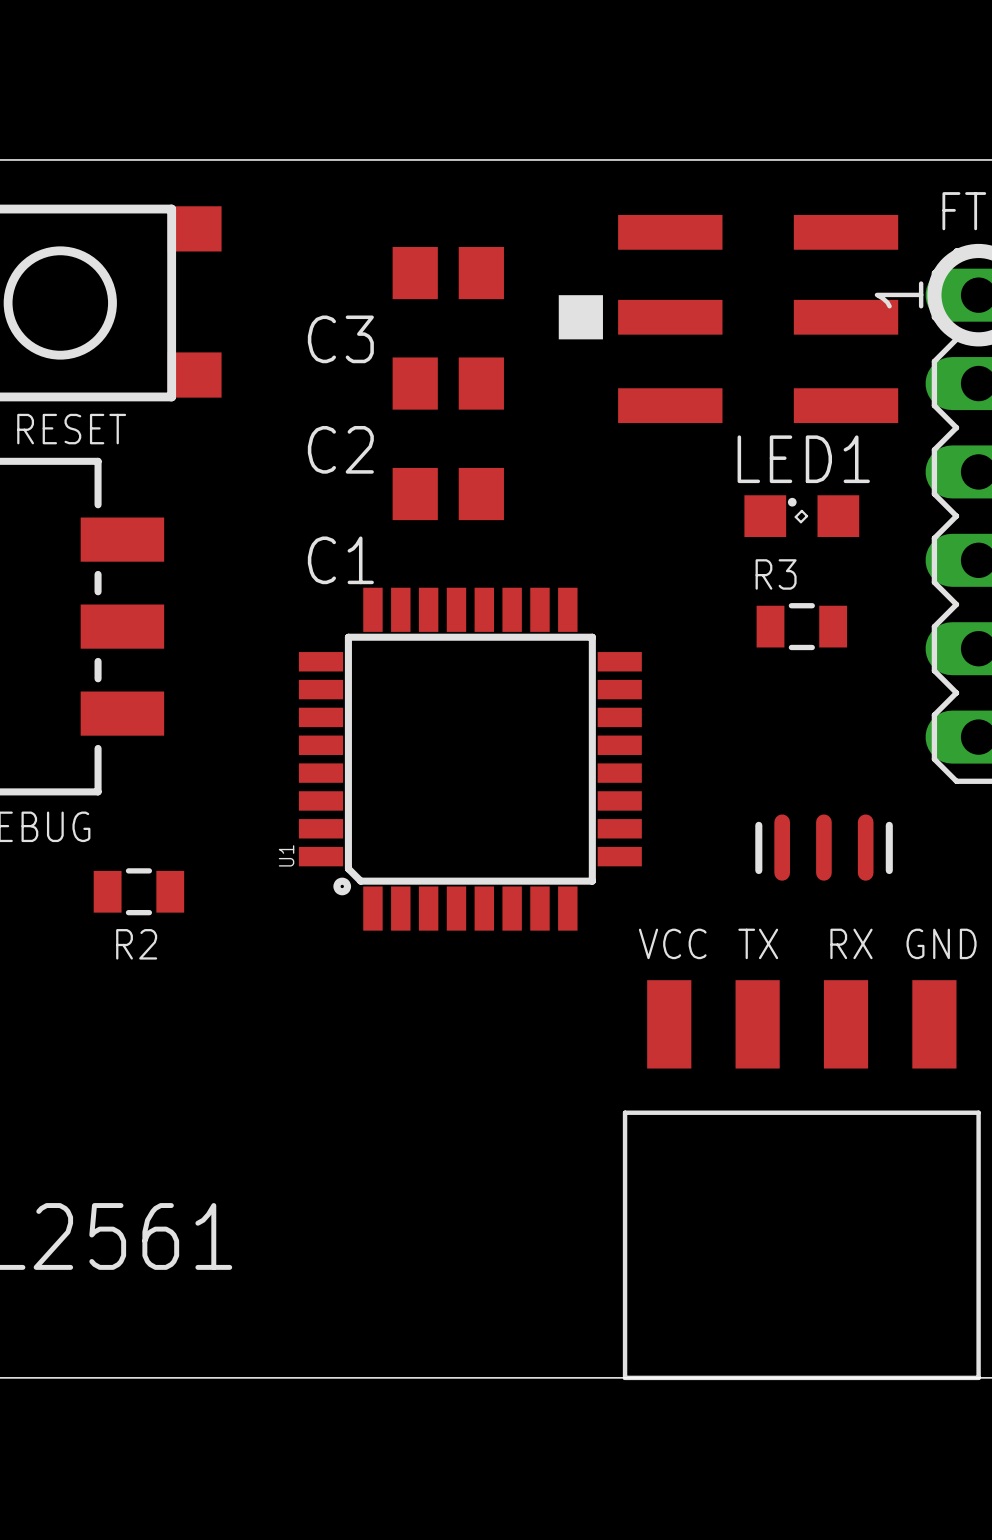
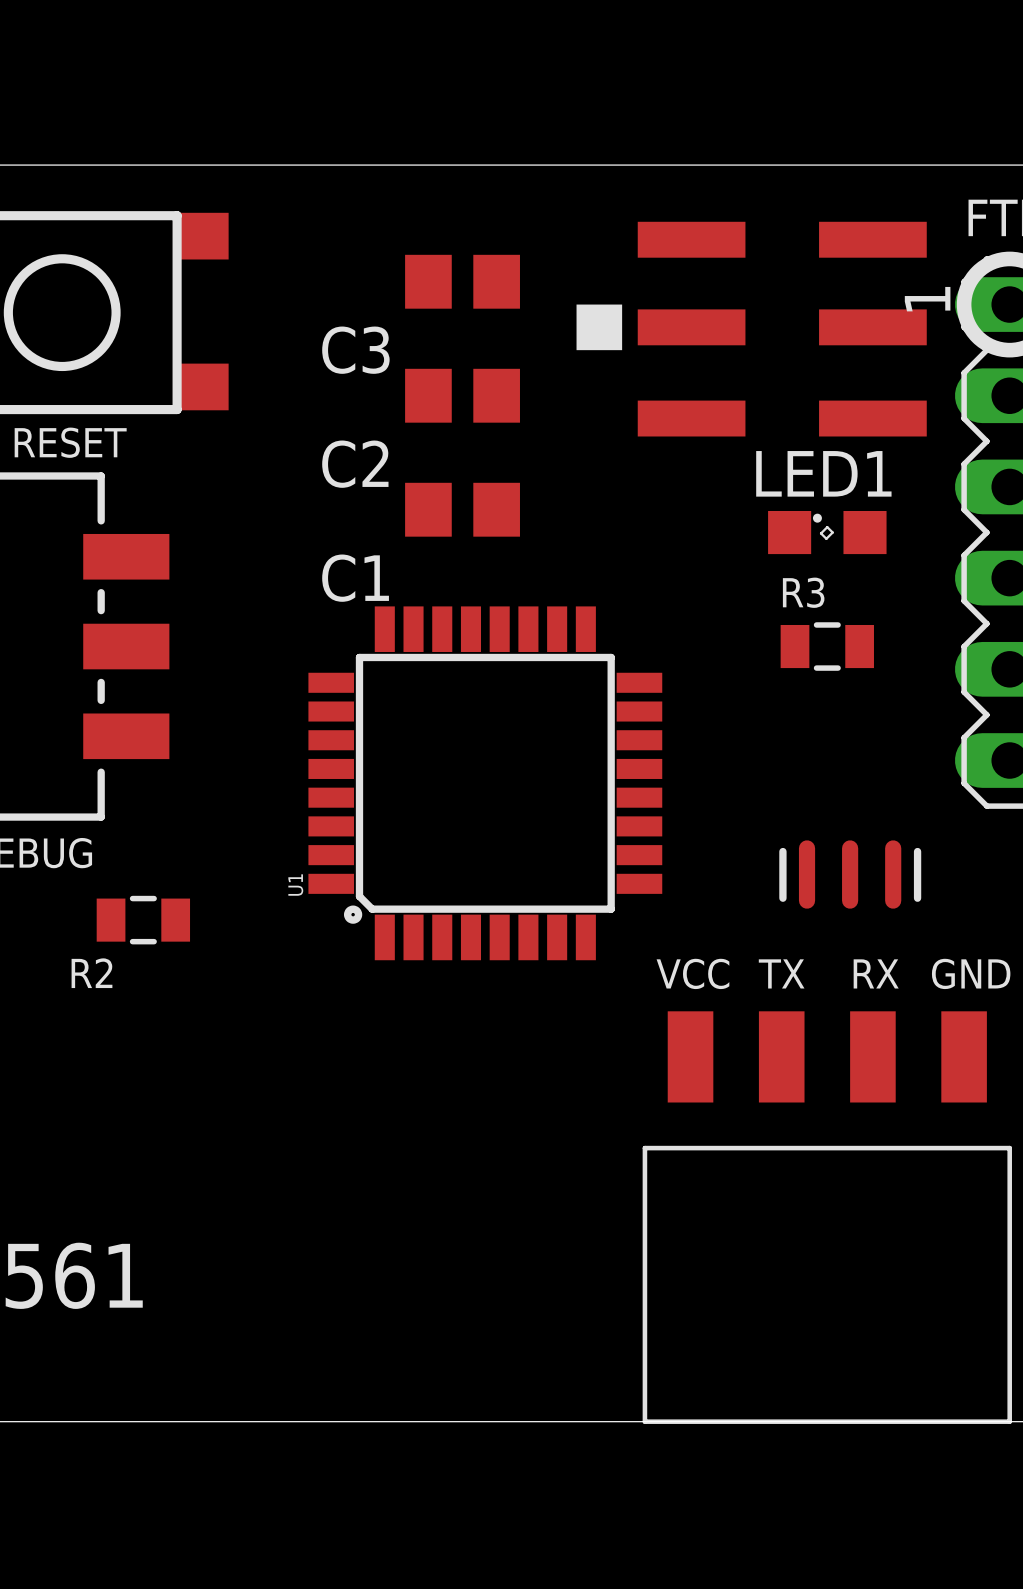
R2 name position: R2 (136, 944) -> R2 (91, 973)

